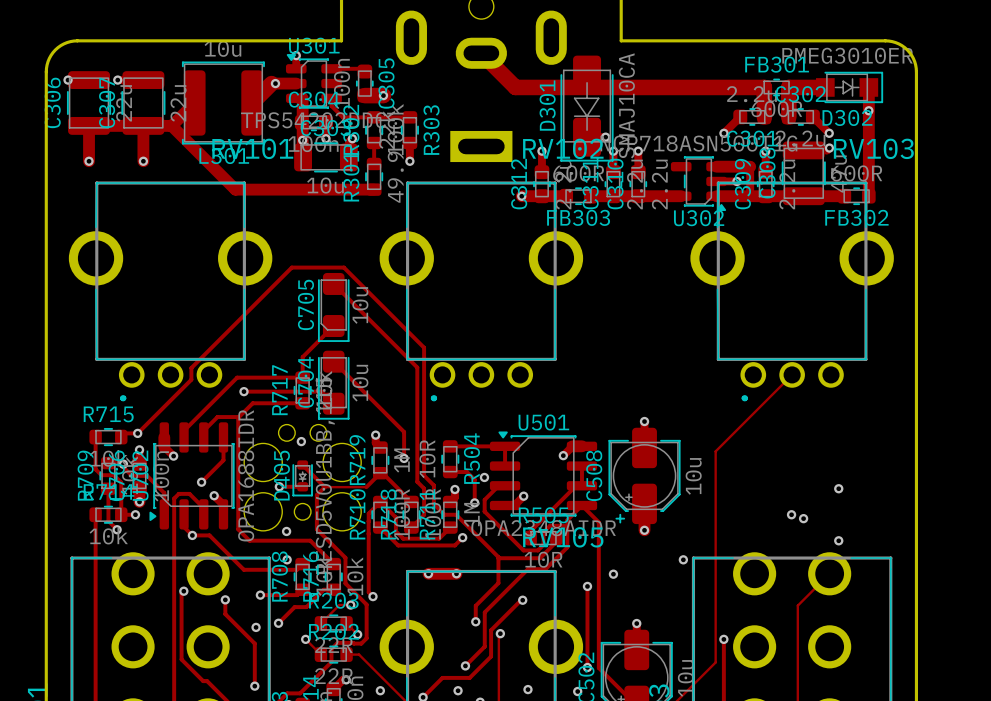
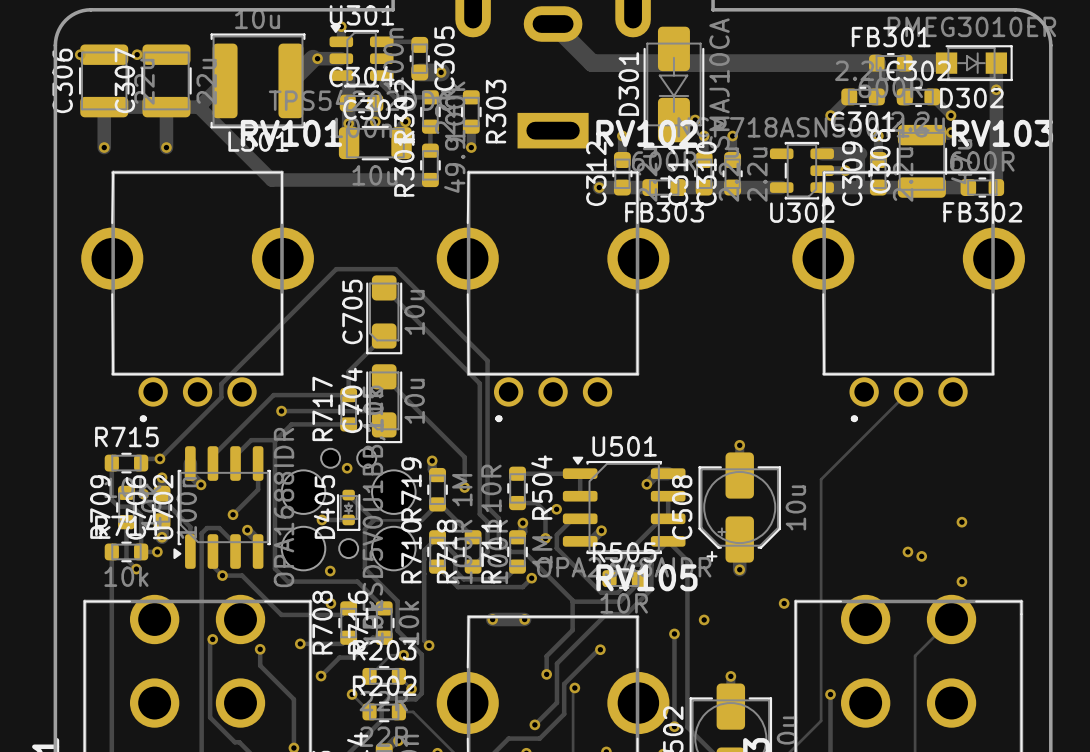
via: (256, 627) -> none

